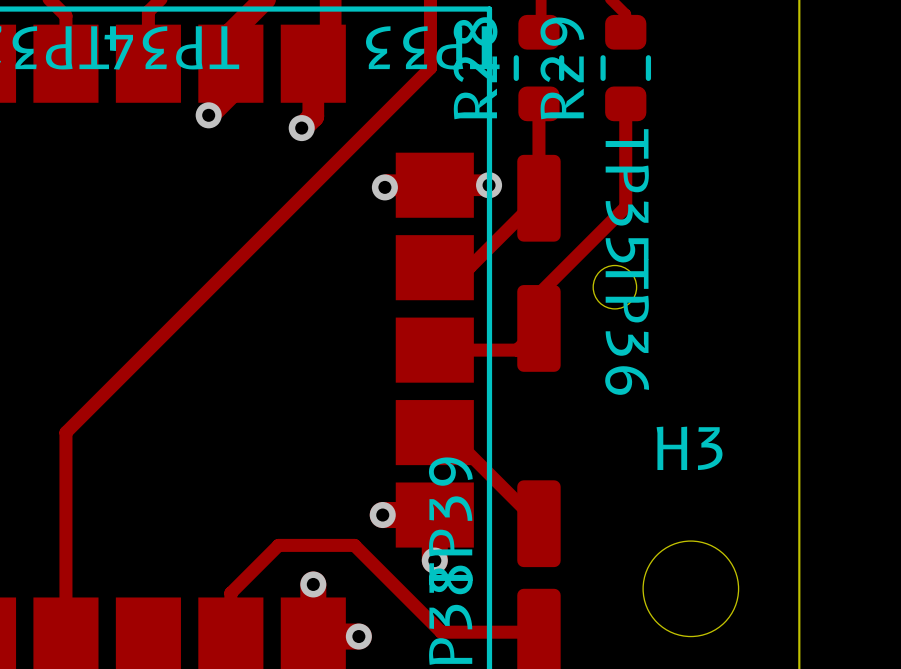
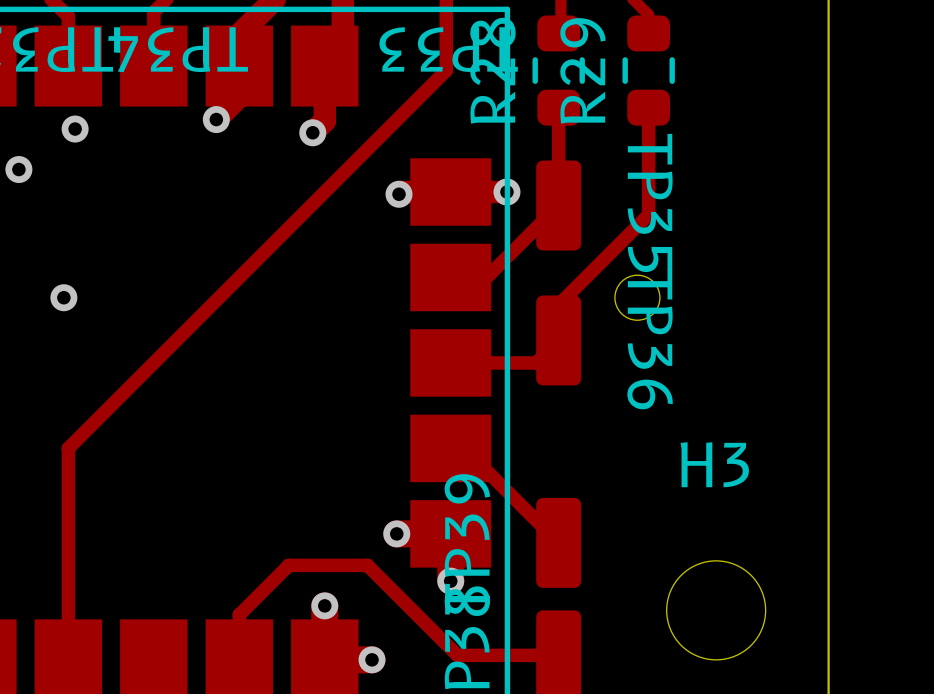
via: none -> (75, 129)
via: none -> (18, 169)
via: none -> (63, 297)

